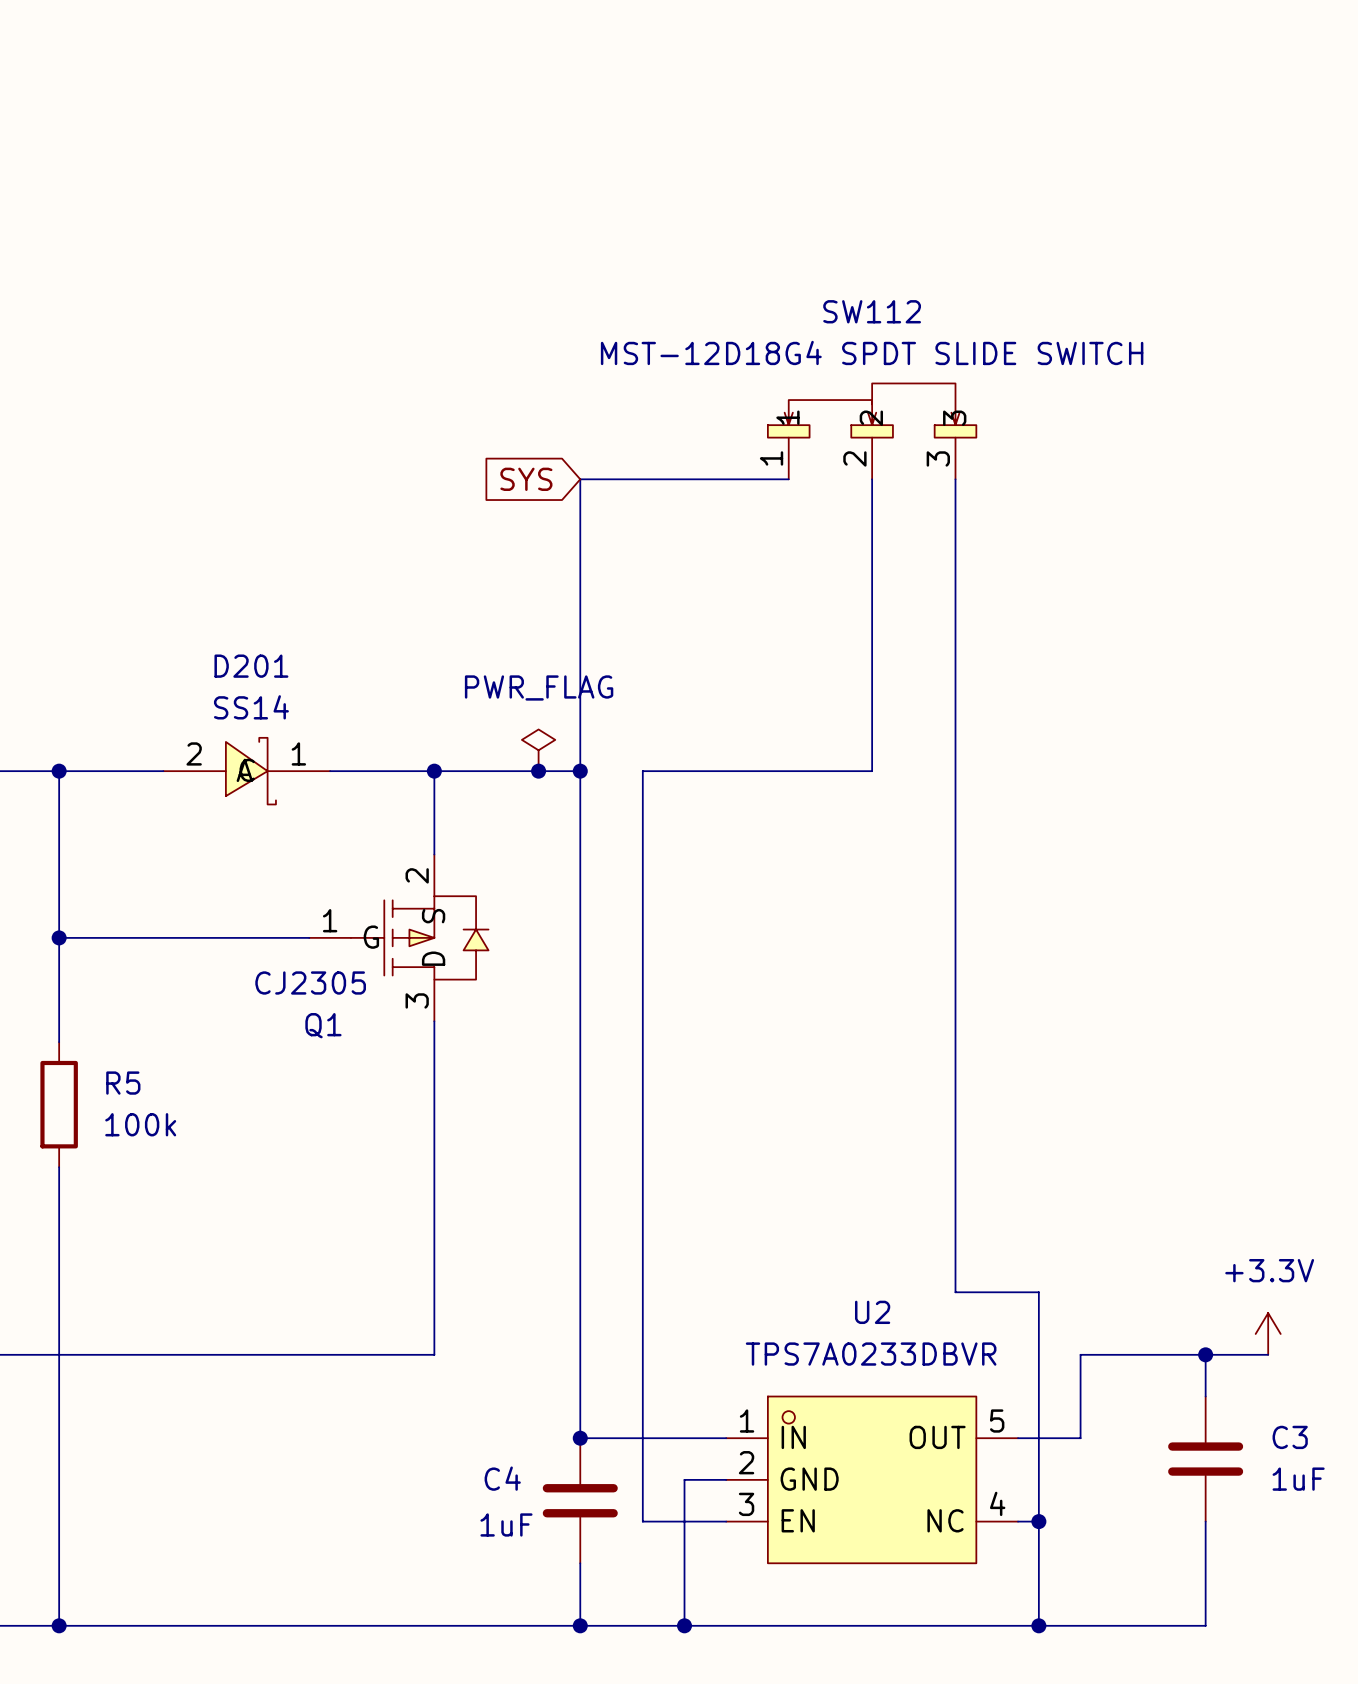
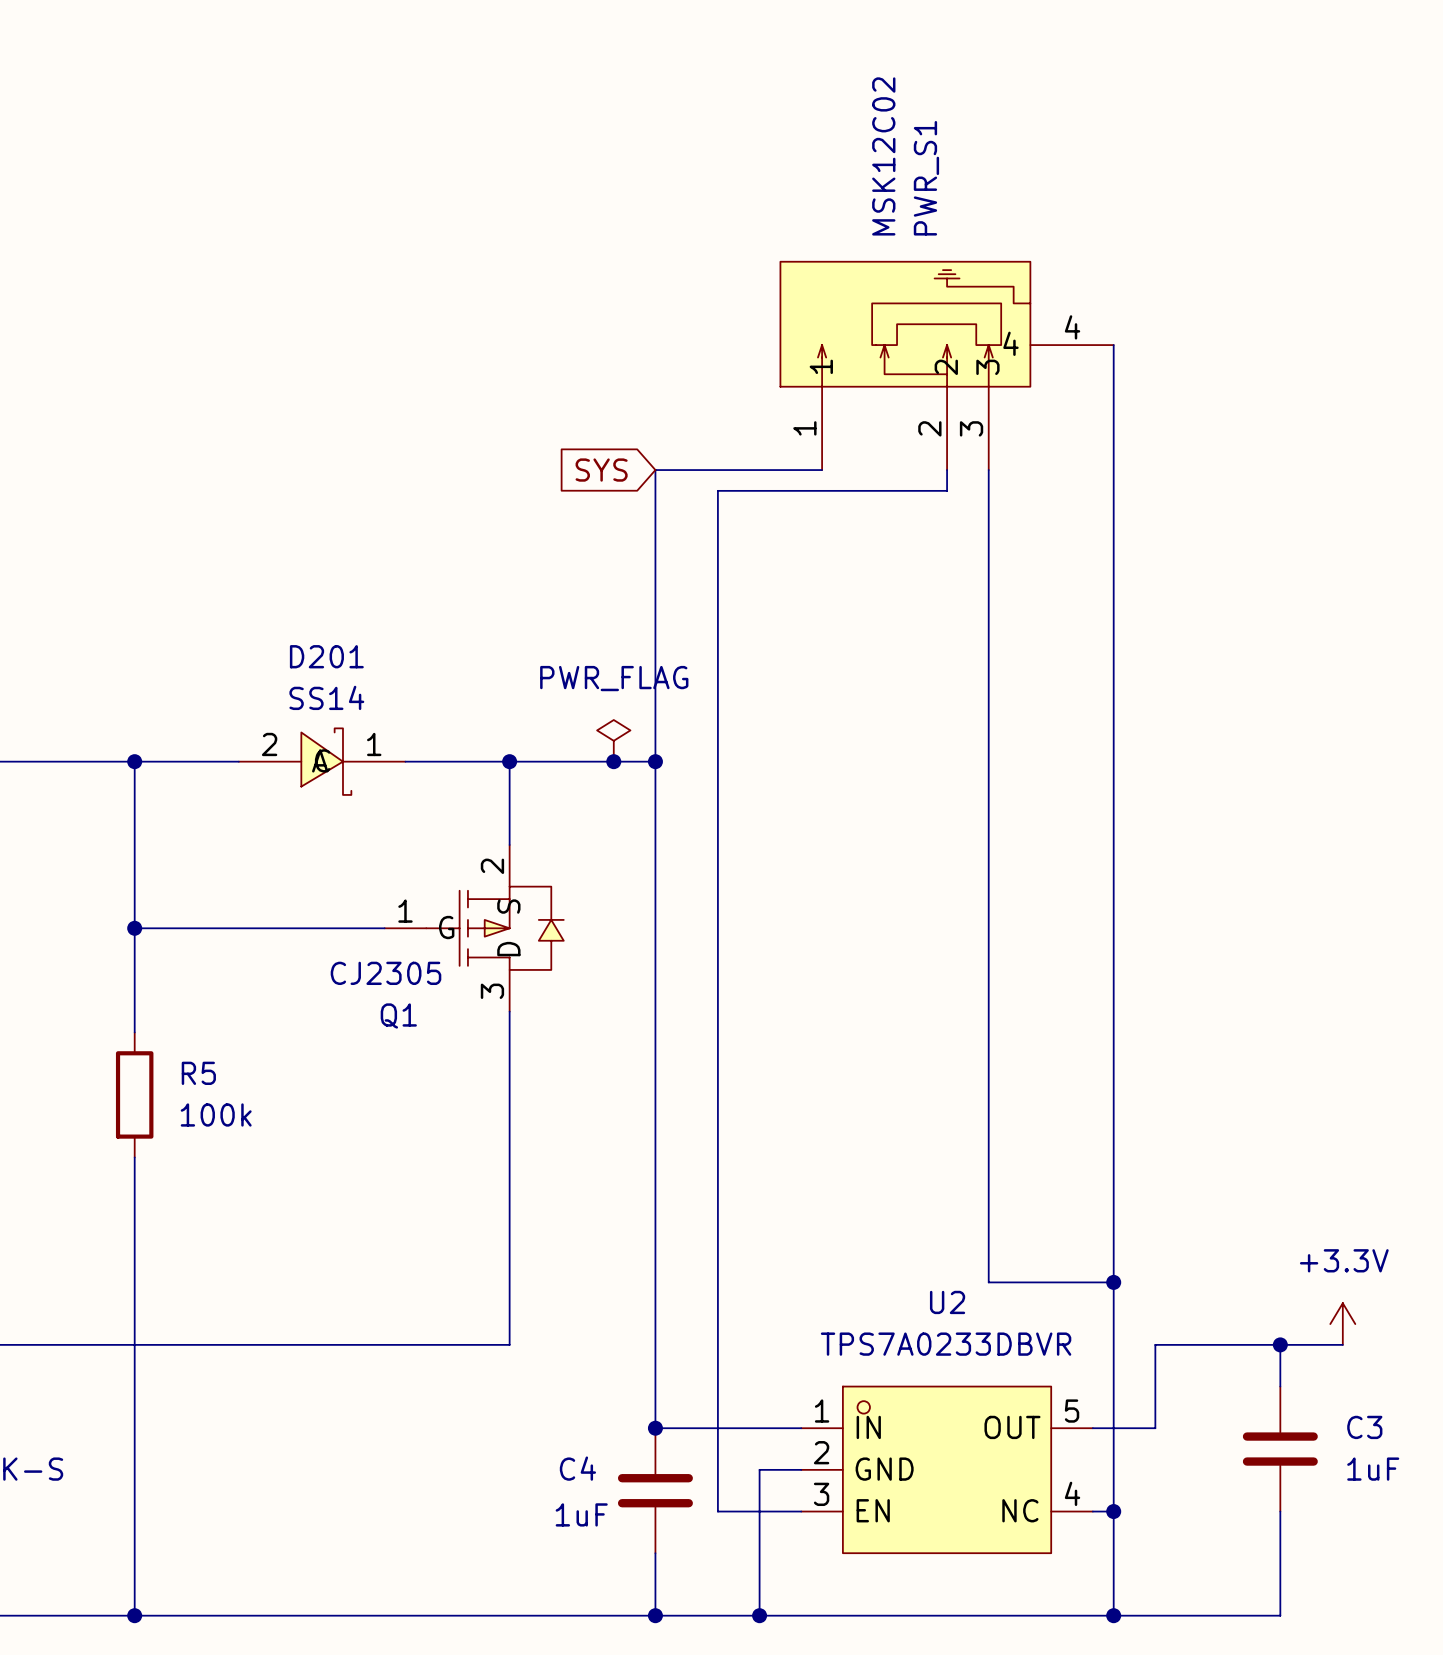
wire: none -> (1113, 345) (1113, 1282)
PWR_S1: none -> MSK12C02 (947, 365)
SW112: MST-12D18G4 SPDT SLIDE SWITCH (872, 431) -> none
wire: (747, 479) (788, 479) -> none
wire: (955, 479) (955, 1292) -> (988, 470) (988, 1282) (1030, 1282)
wire: (872, 500) (872, 771) (642, 771) -> (947, 490) (717, 490) (717, 761)
junction: none -> (1113, 1282)

